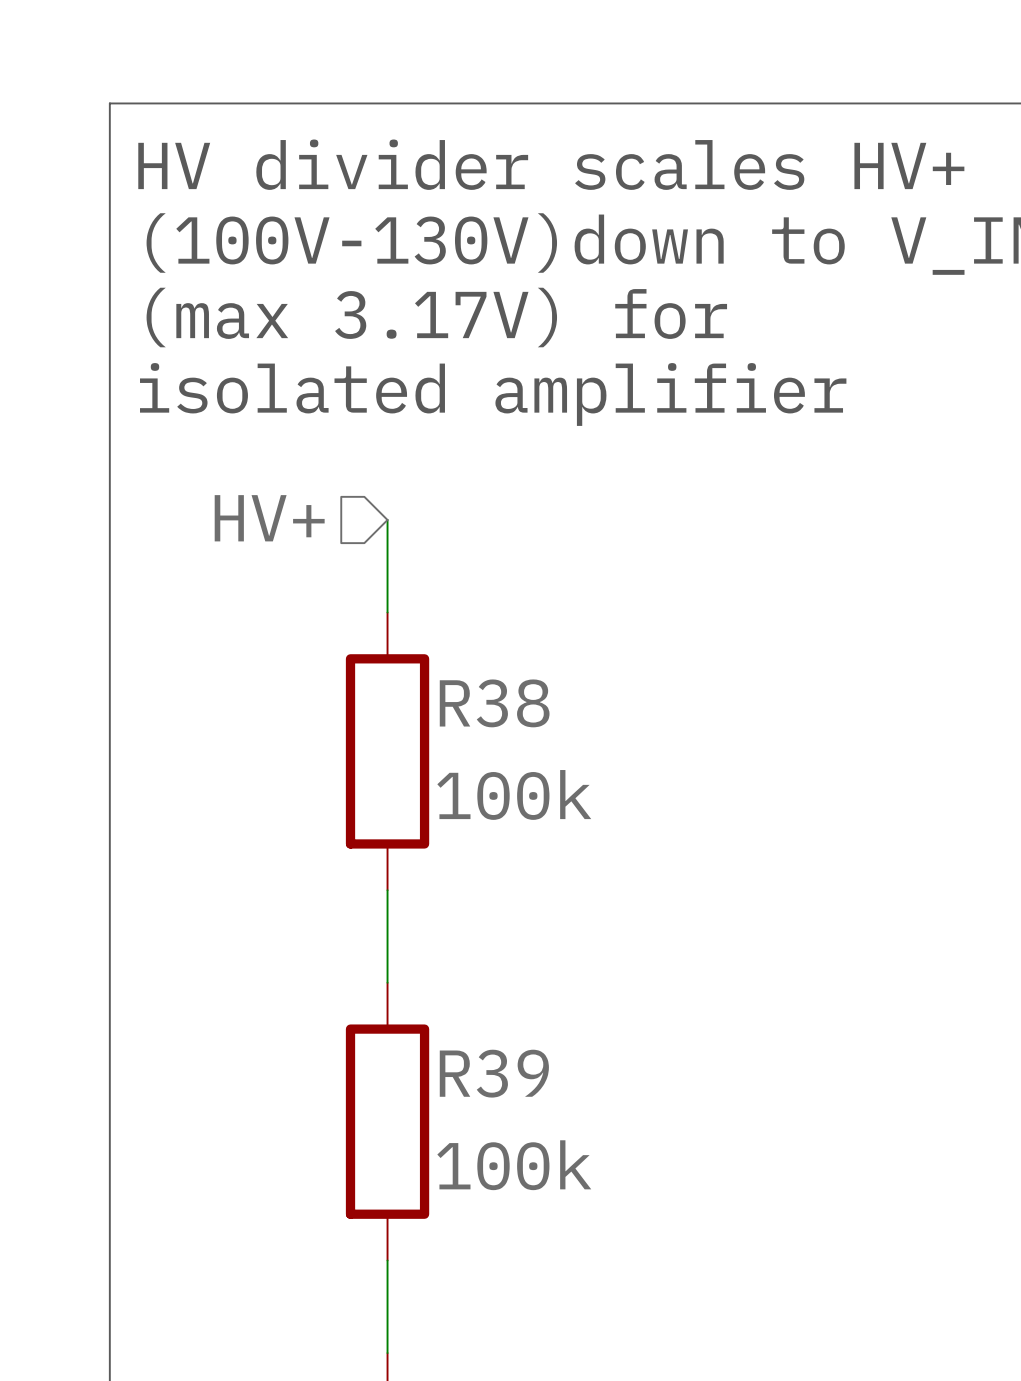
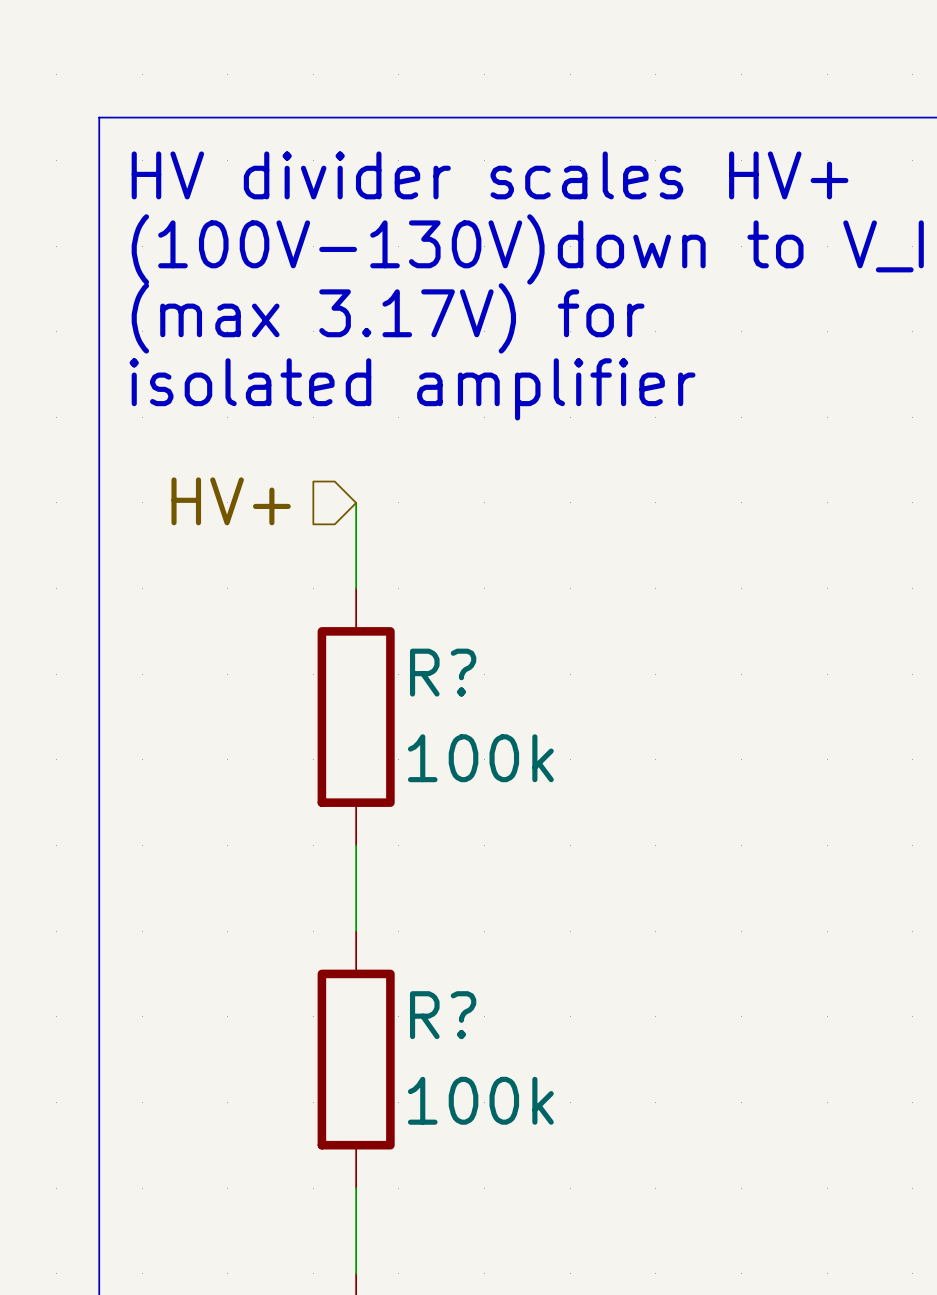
R38 name: R38 (494, 703) -> R? (443, 672)
R39 name: R39 (494, 1073) -> R? (443, 1015)

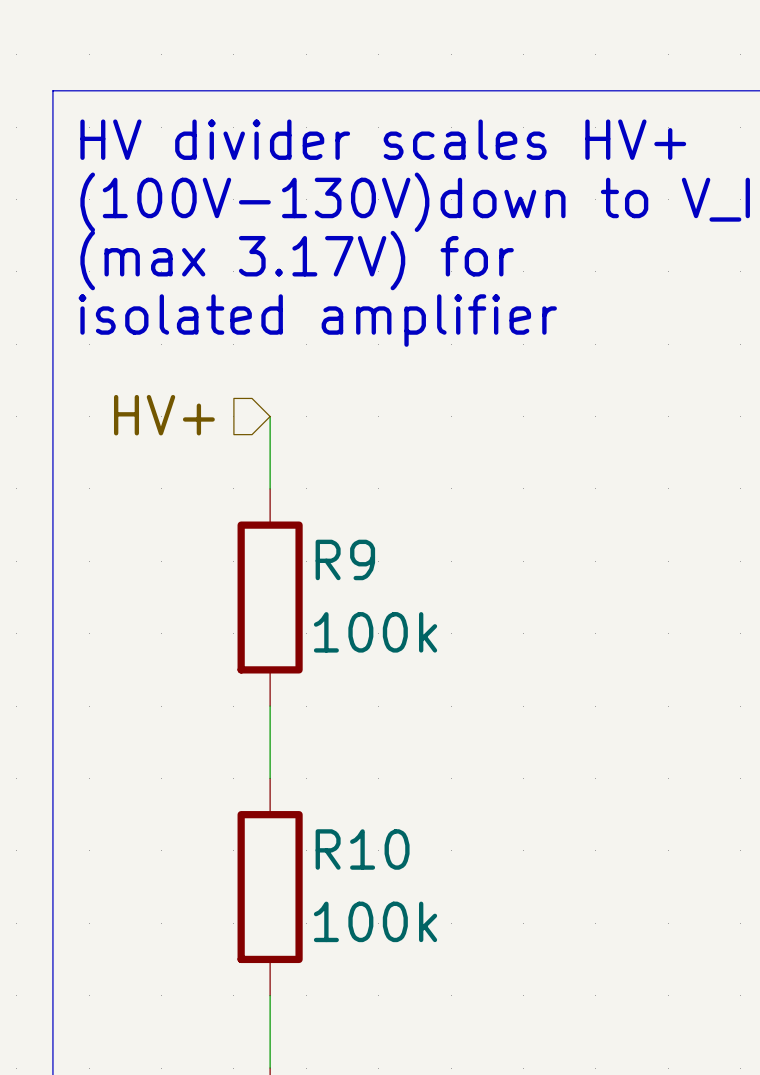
R? name: R? (443, 672) -> R9 (345, 559)
R? name: R? (443, 1015) -> R10 (362, 849)

